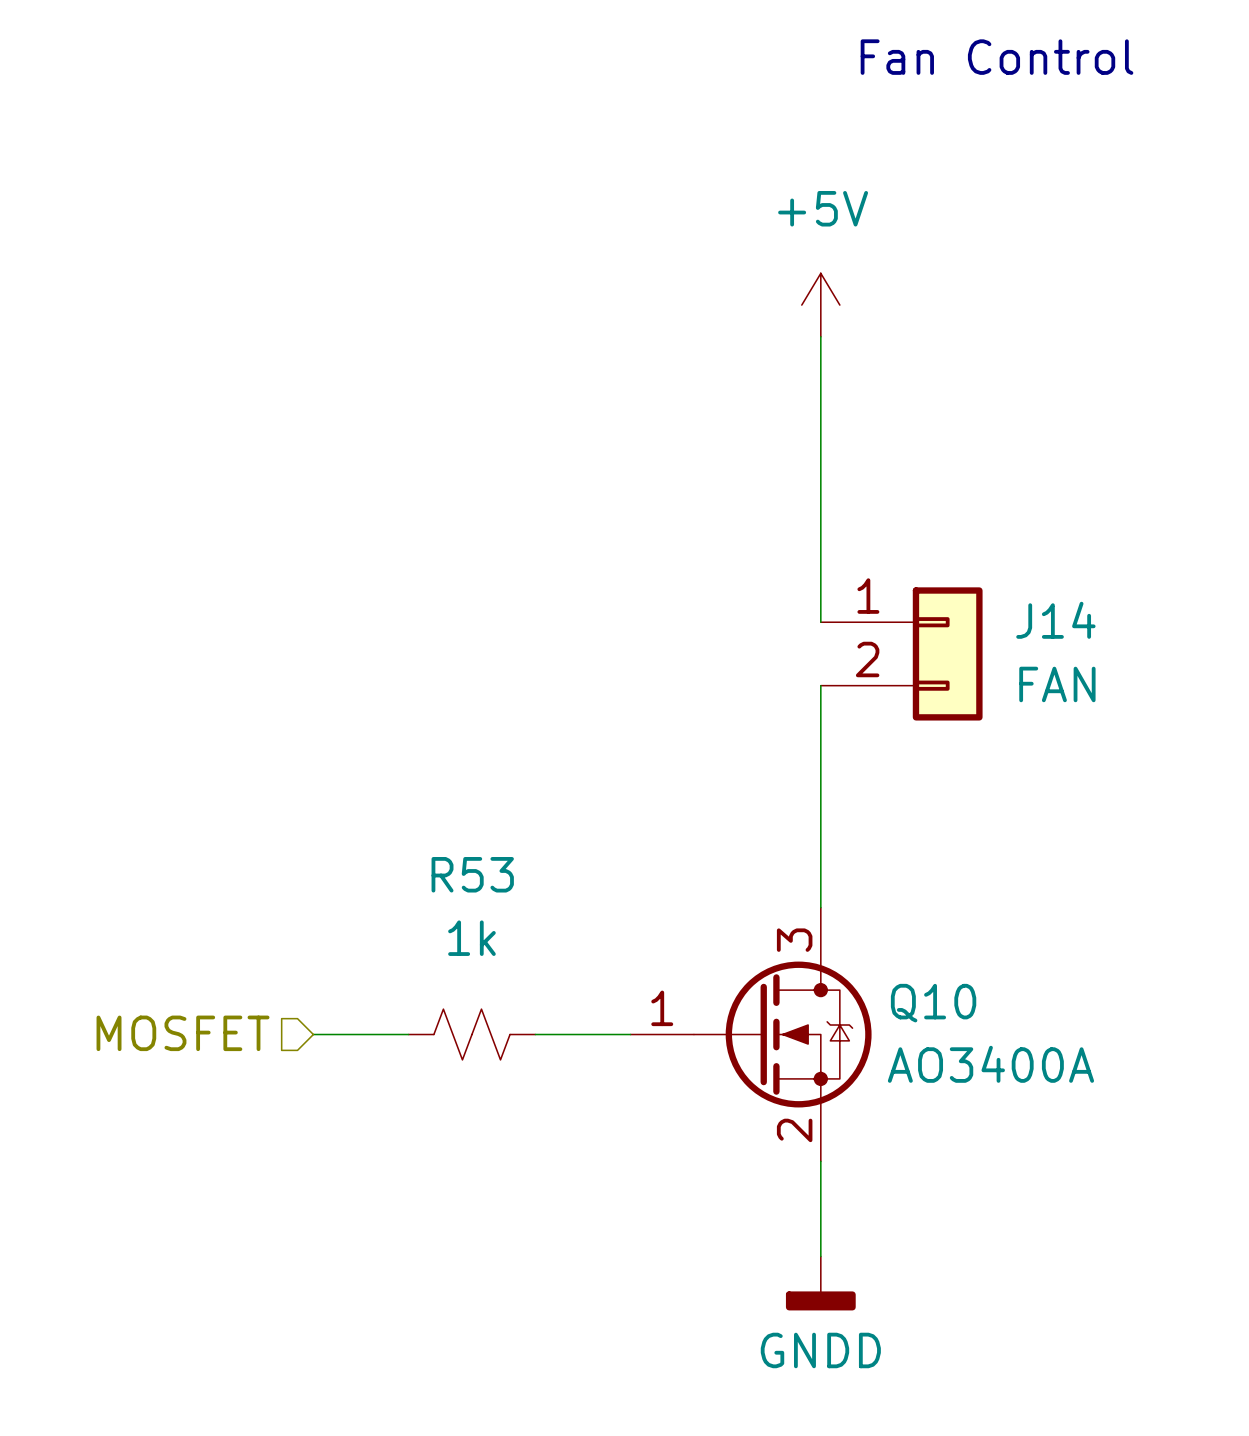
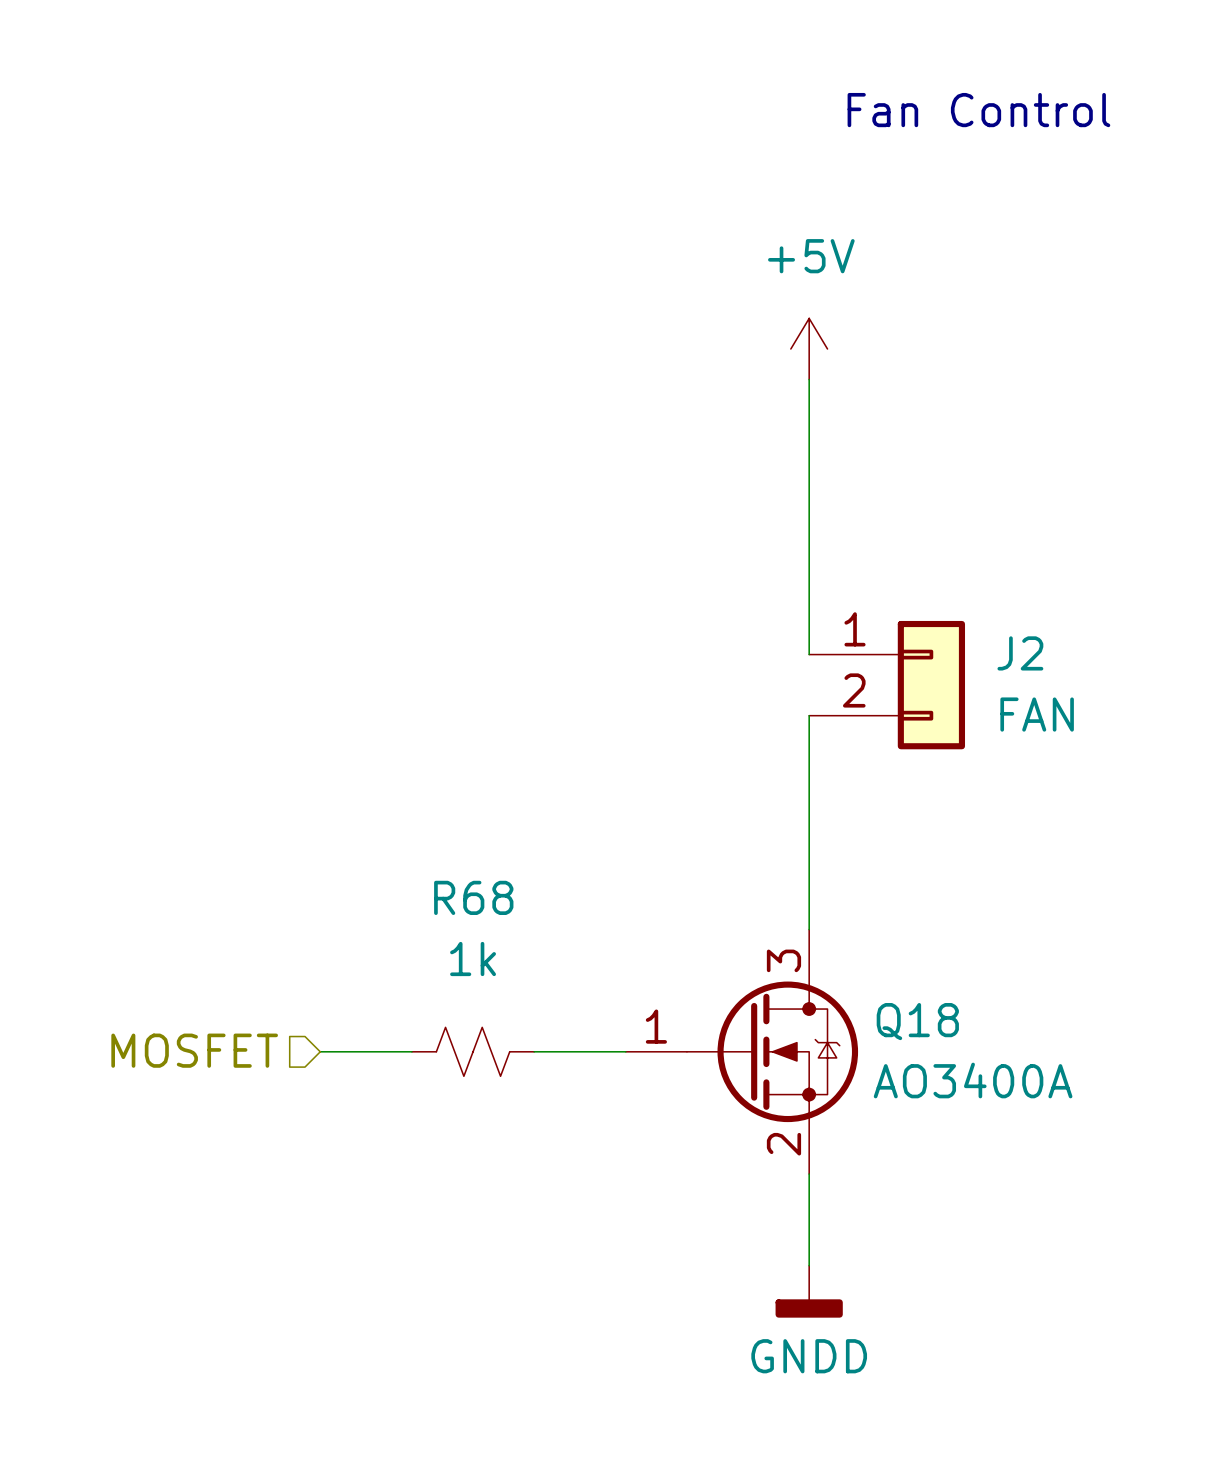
J14 name: J14 (1055, 620) -> J2 (1020, 653)
R53 name: R53 (472, 874) -> R68 (473, 897)
Q10 name: Q10 (933, 1003) -> Q18 (917, 1021)

